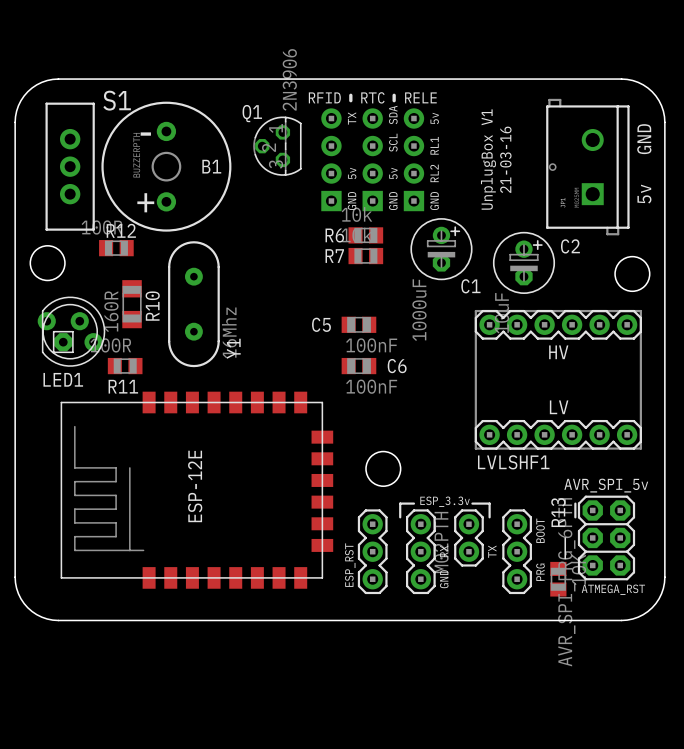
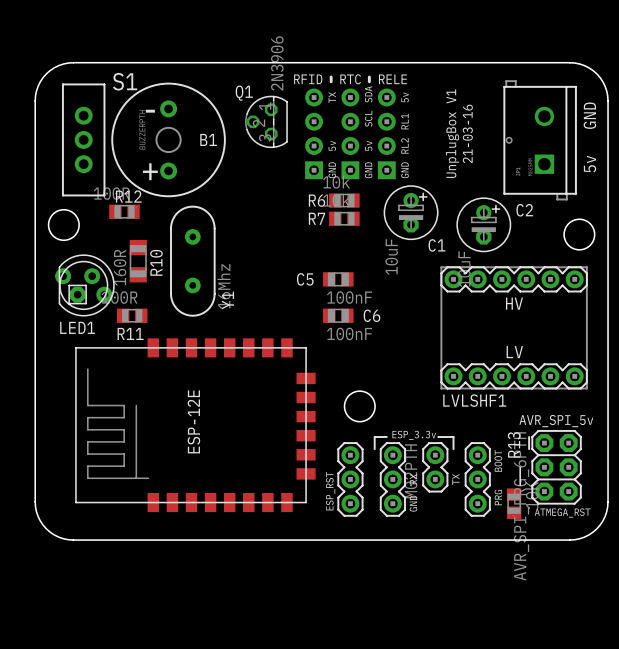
C1 value: 1000uF (419, 310) -> 10uF (391, 257)

